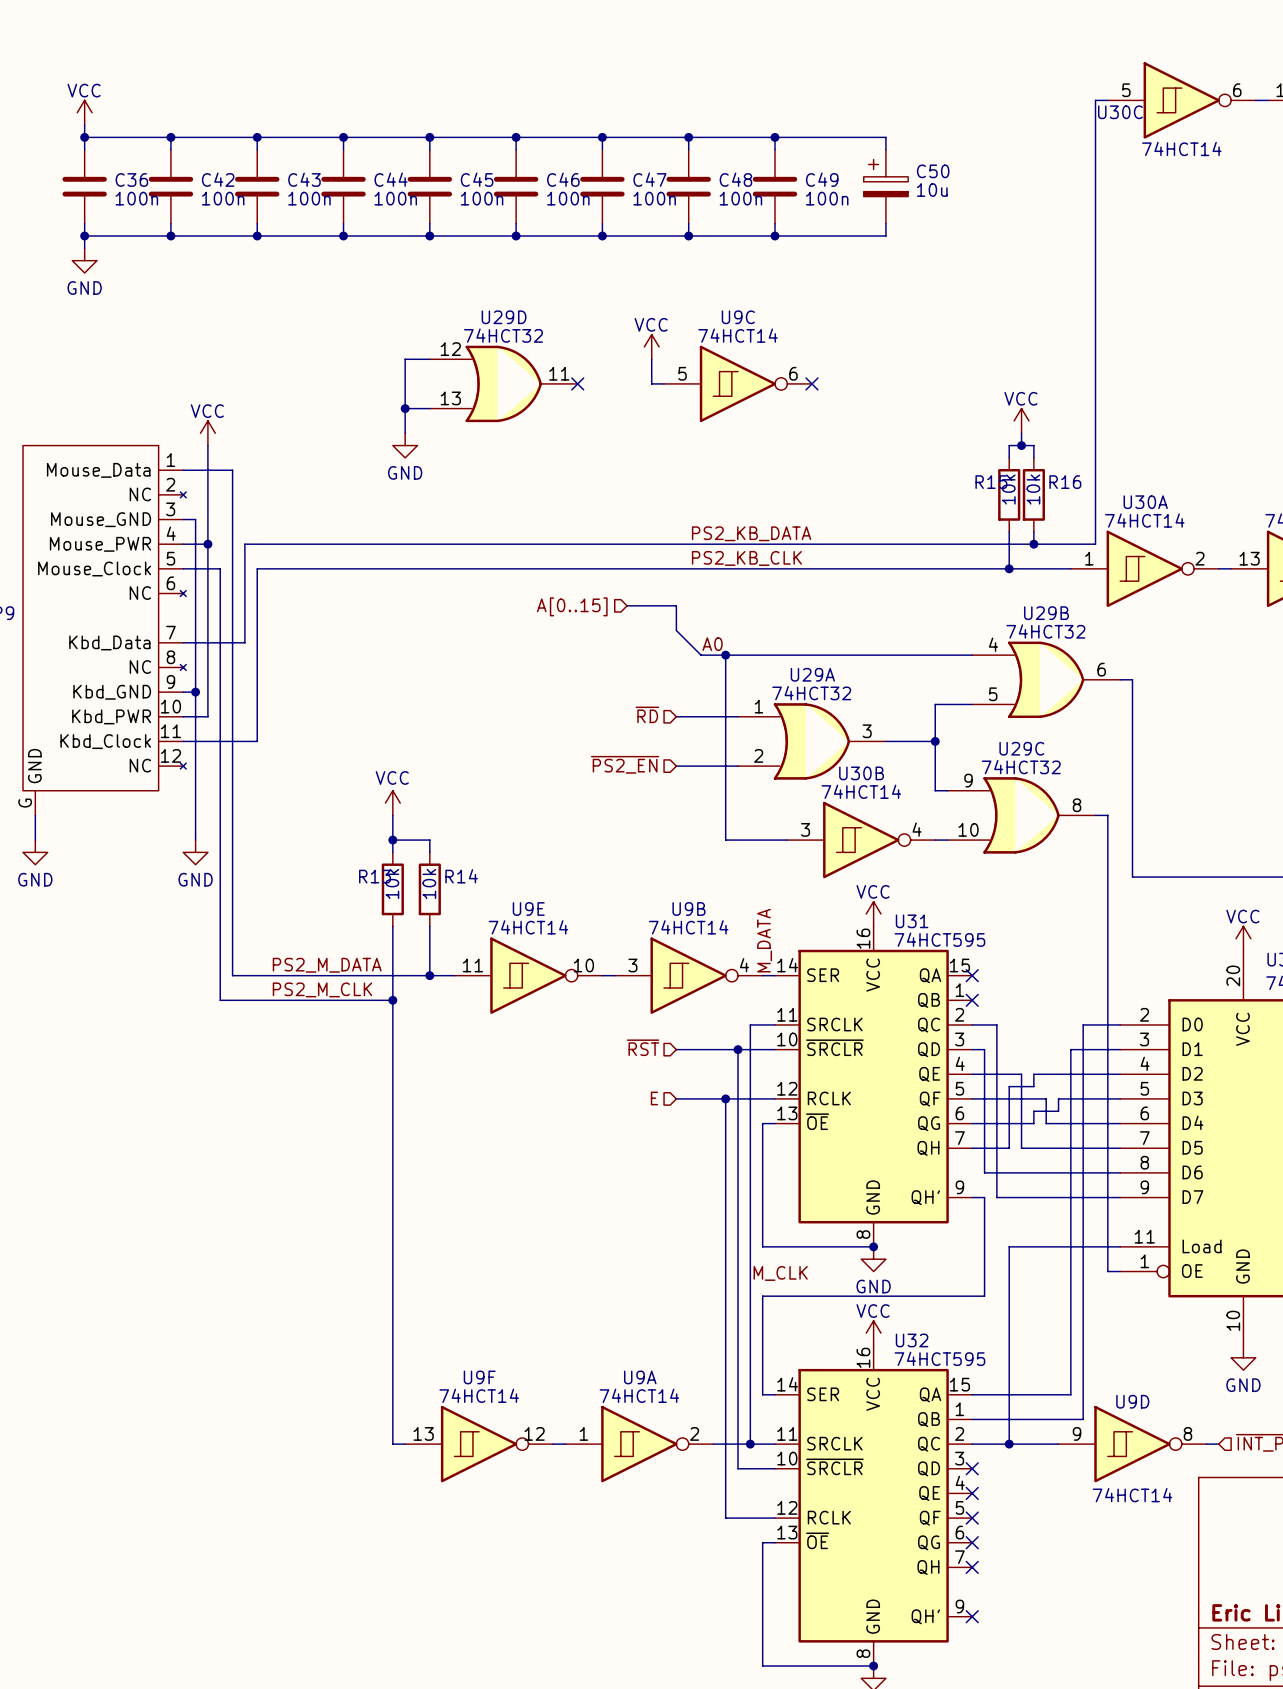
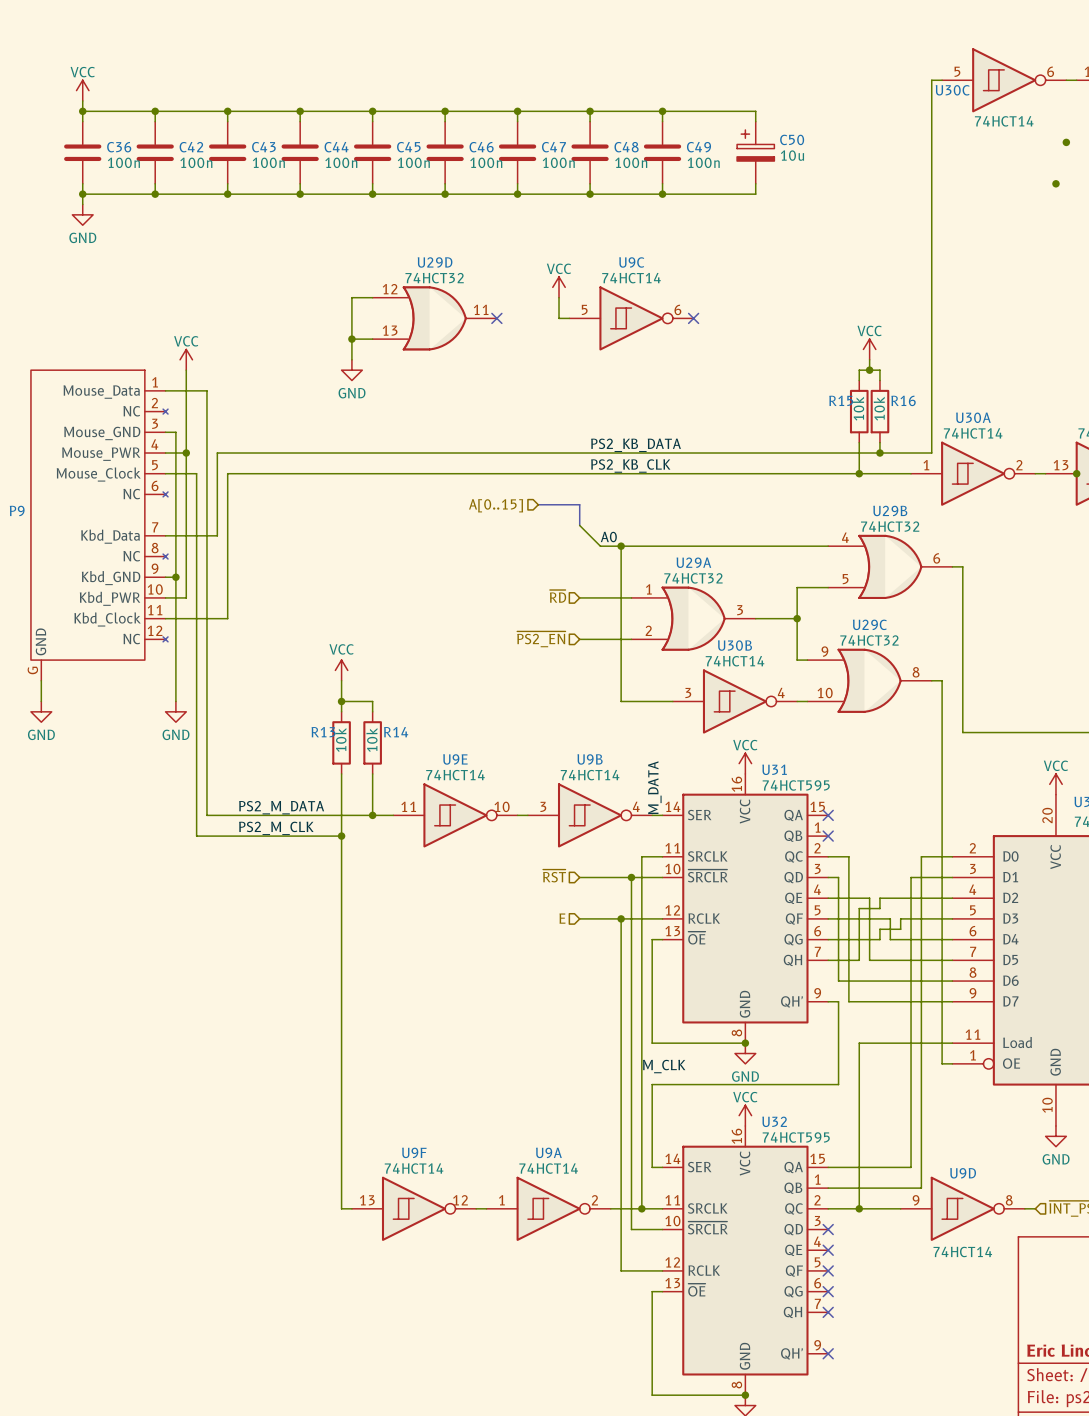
junction: none -> (1066, 142)
junction: none -> (1055, 183)
junction: none -> (1076, 473)

